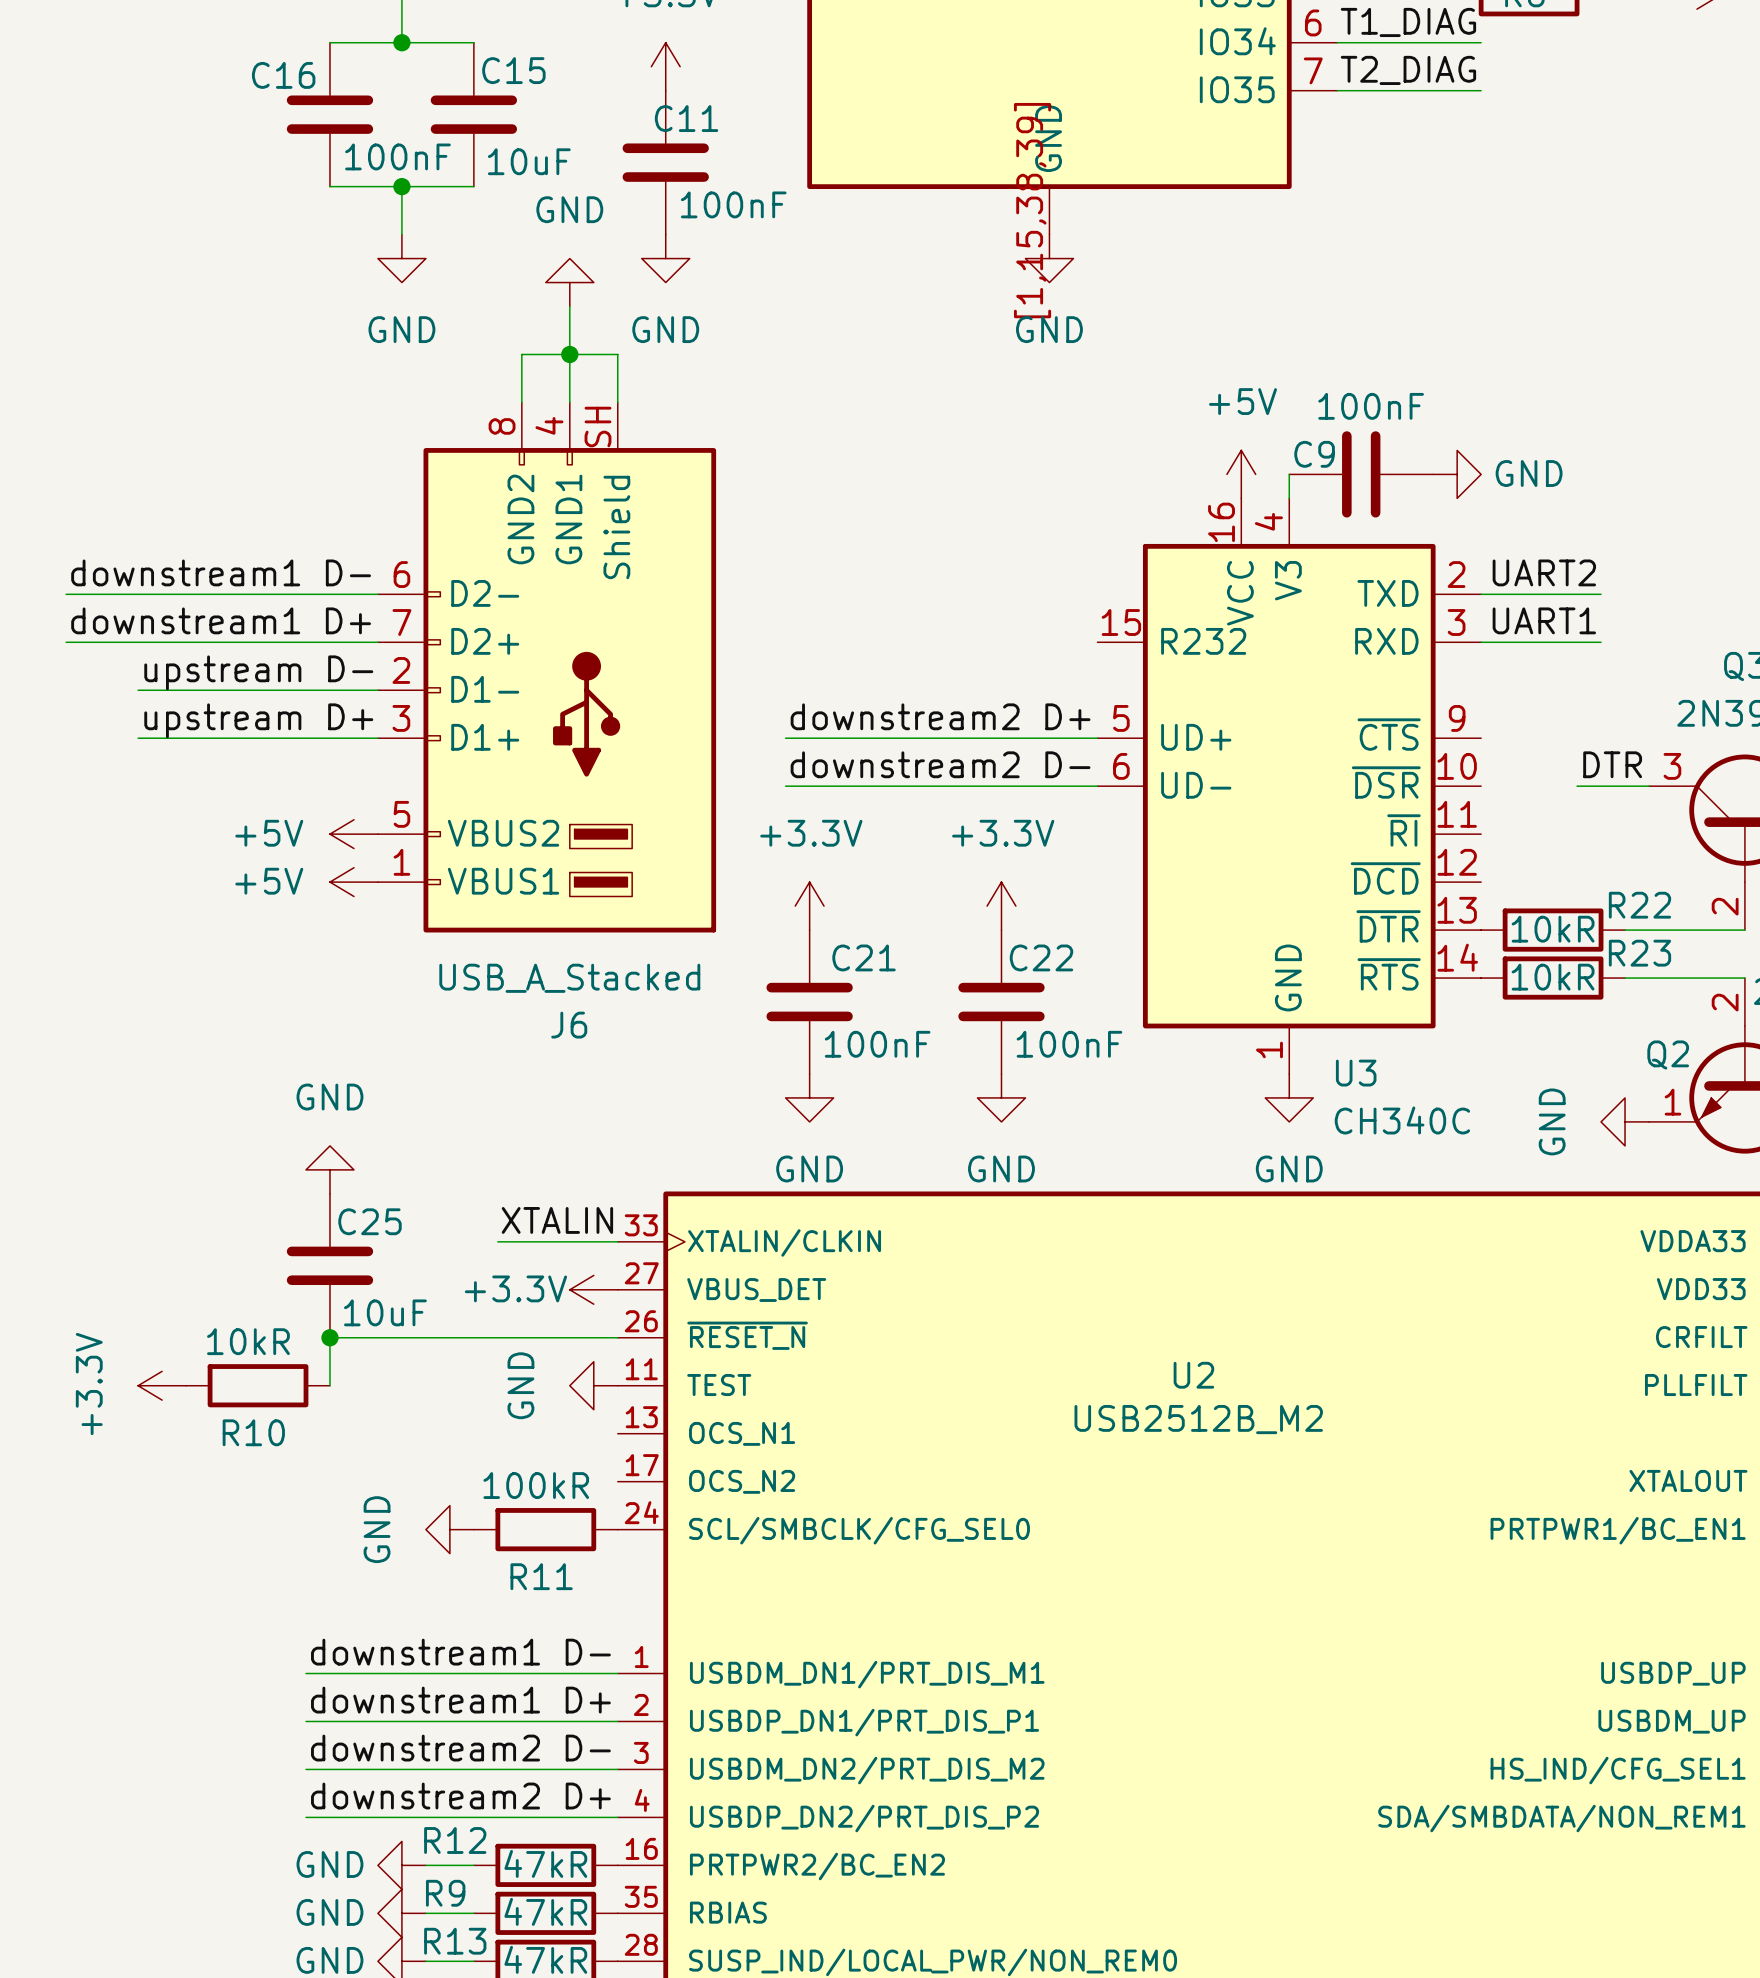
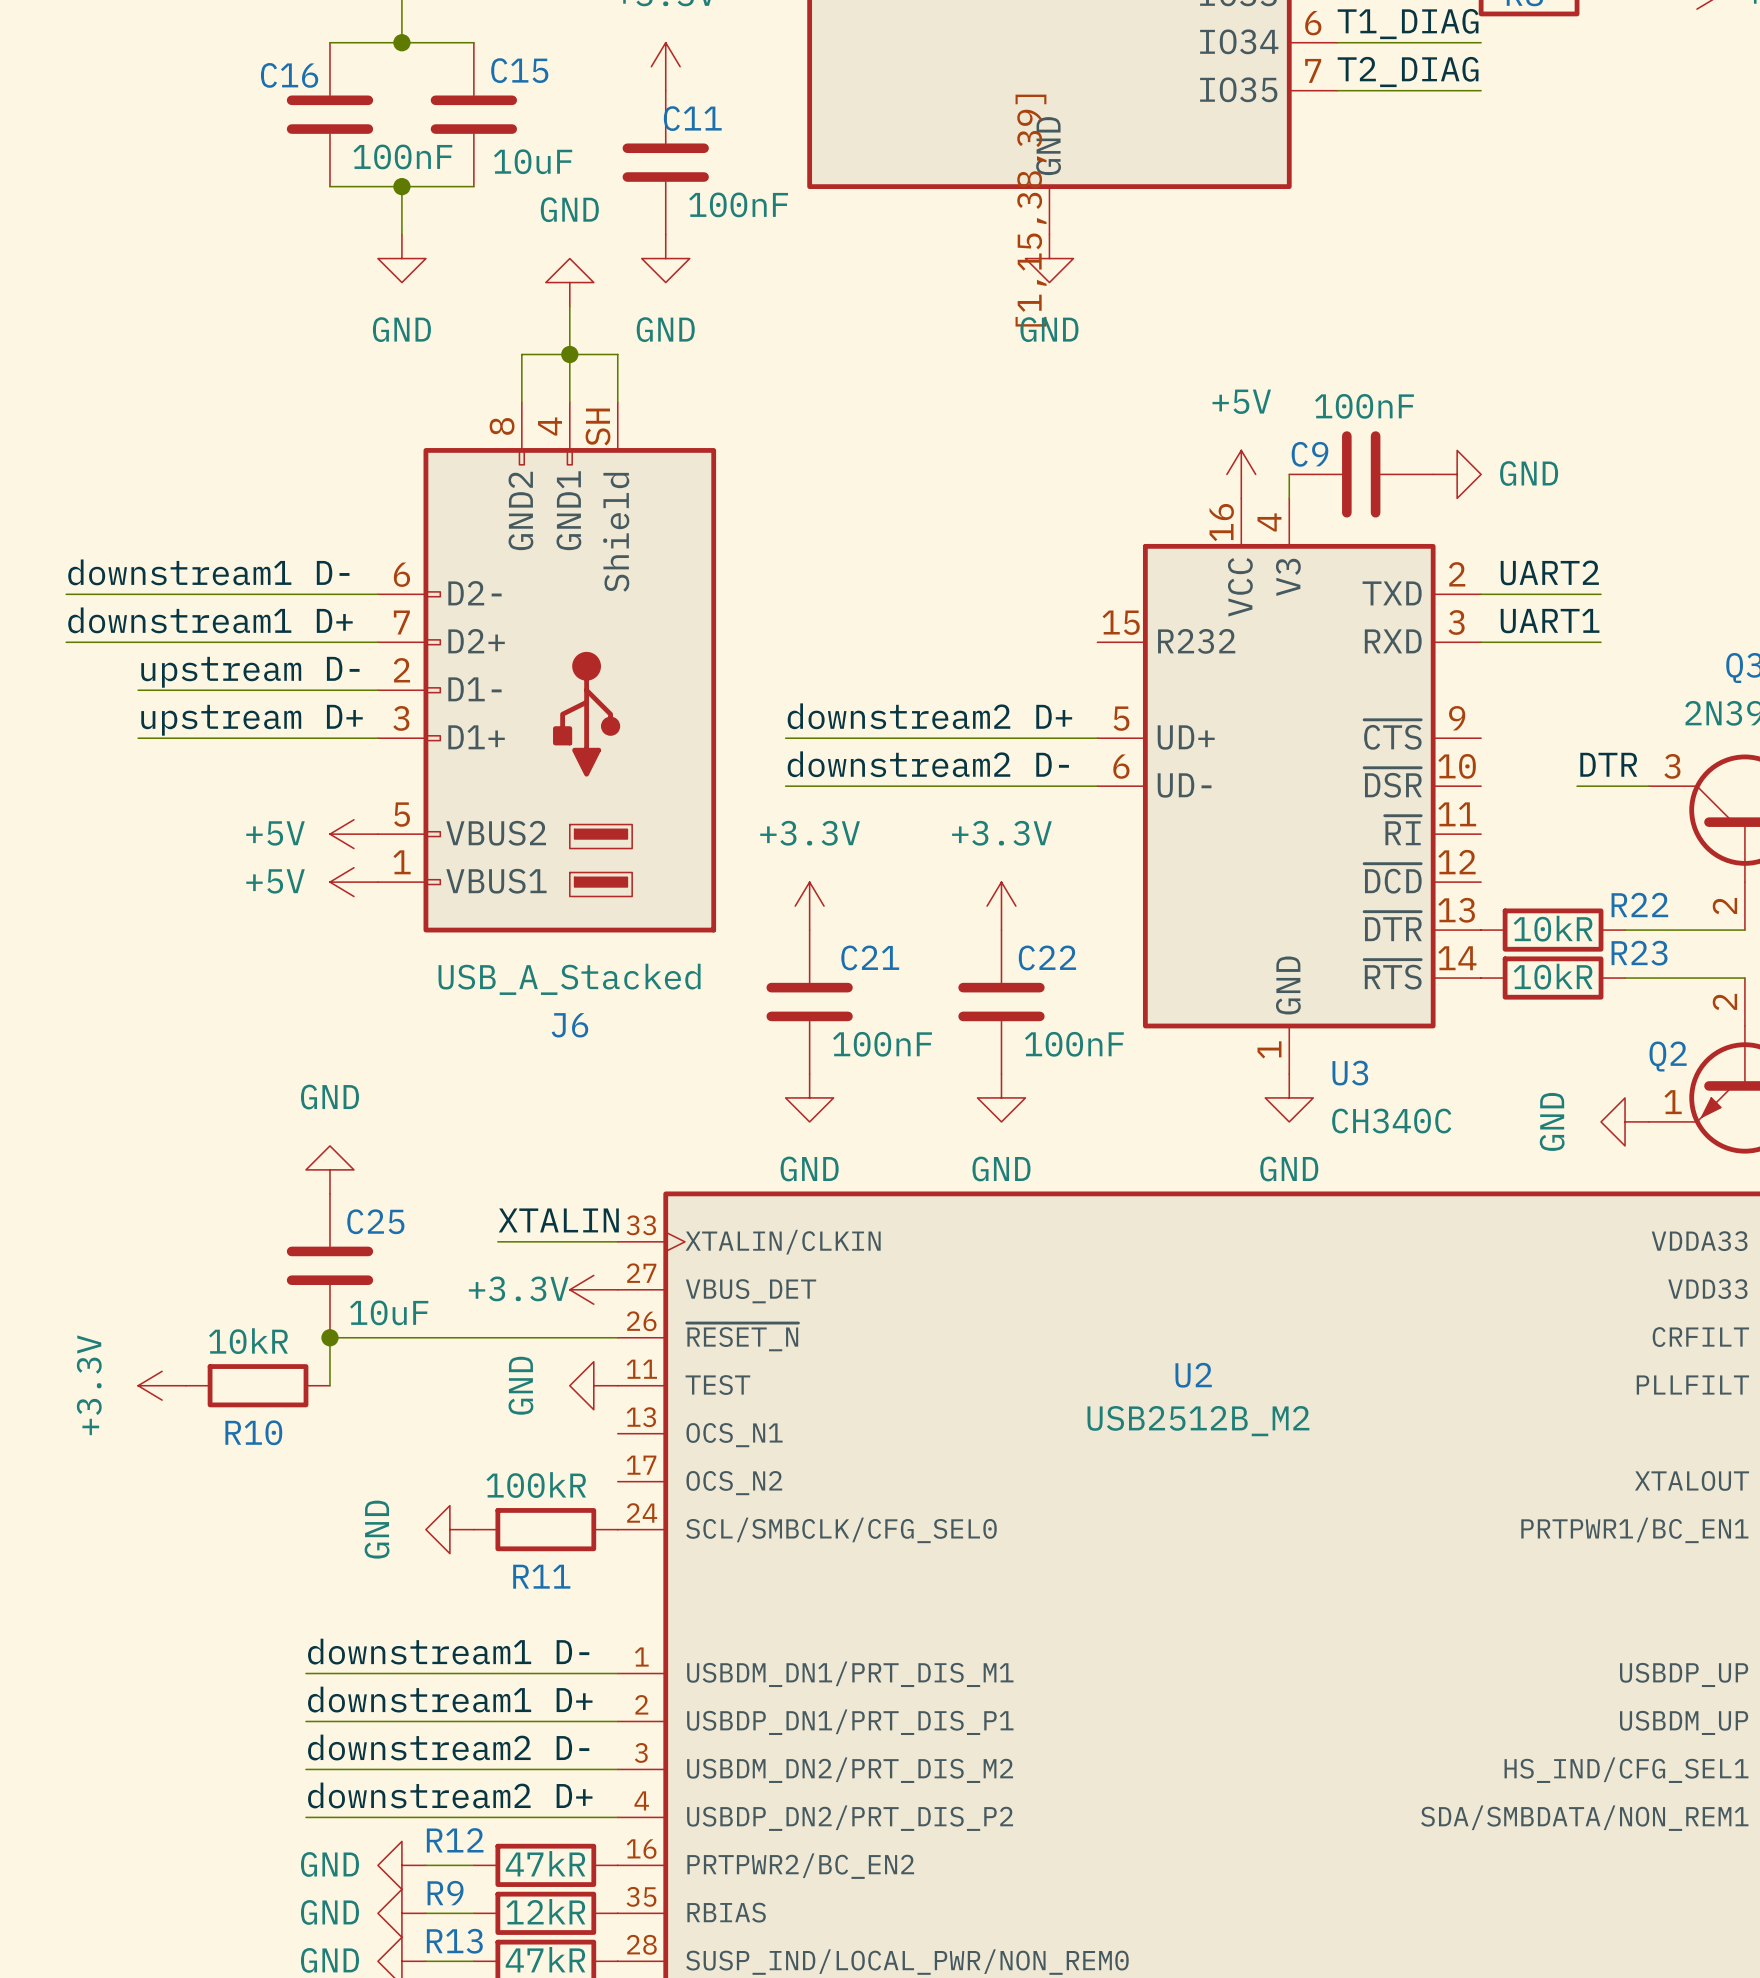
R9 value: 47kR (545, 1911) -> 12kR (545, 1911)

